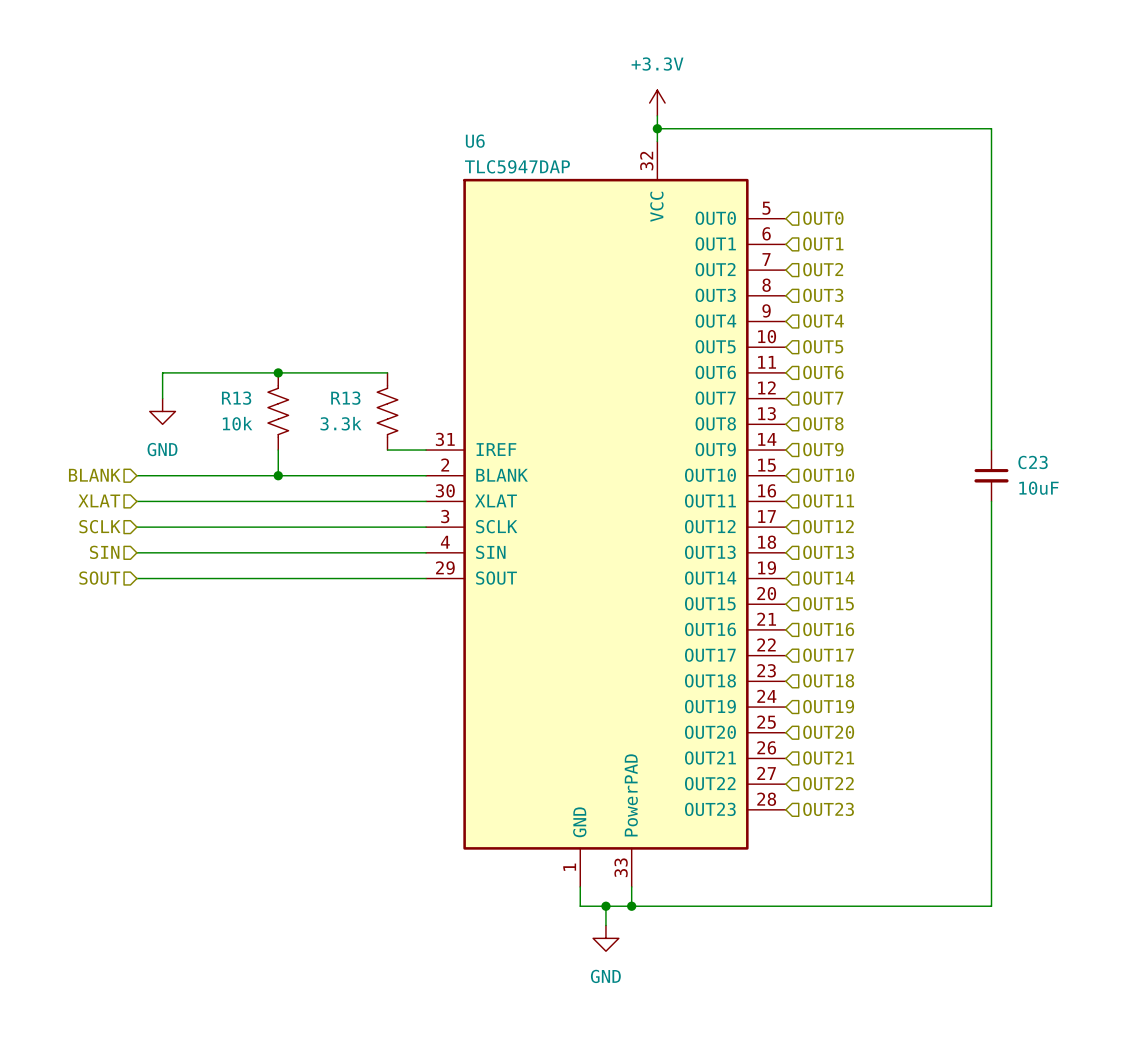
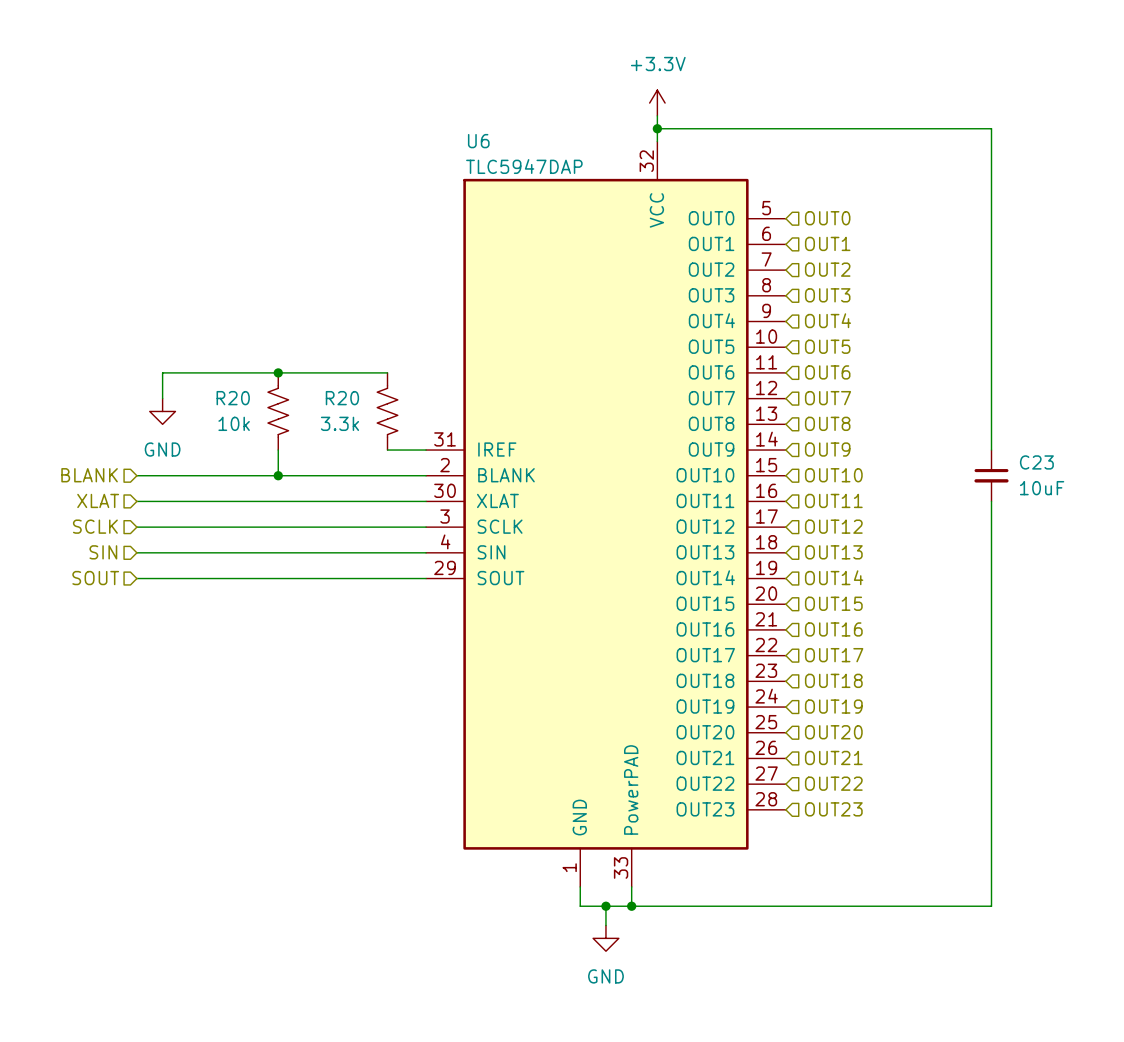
R13 name: R13 (236, 398) -> R20 (233, 398)
R13 name: R13 (345, 398) -> R20 (342, 398)

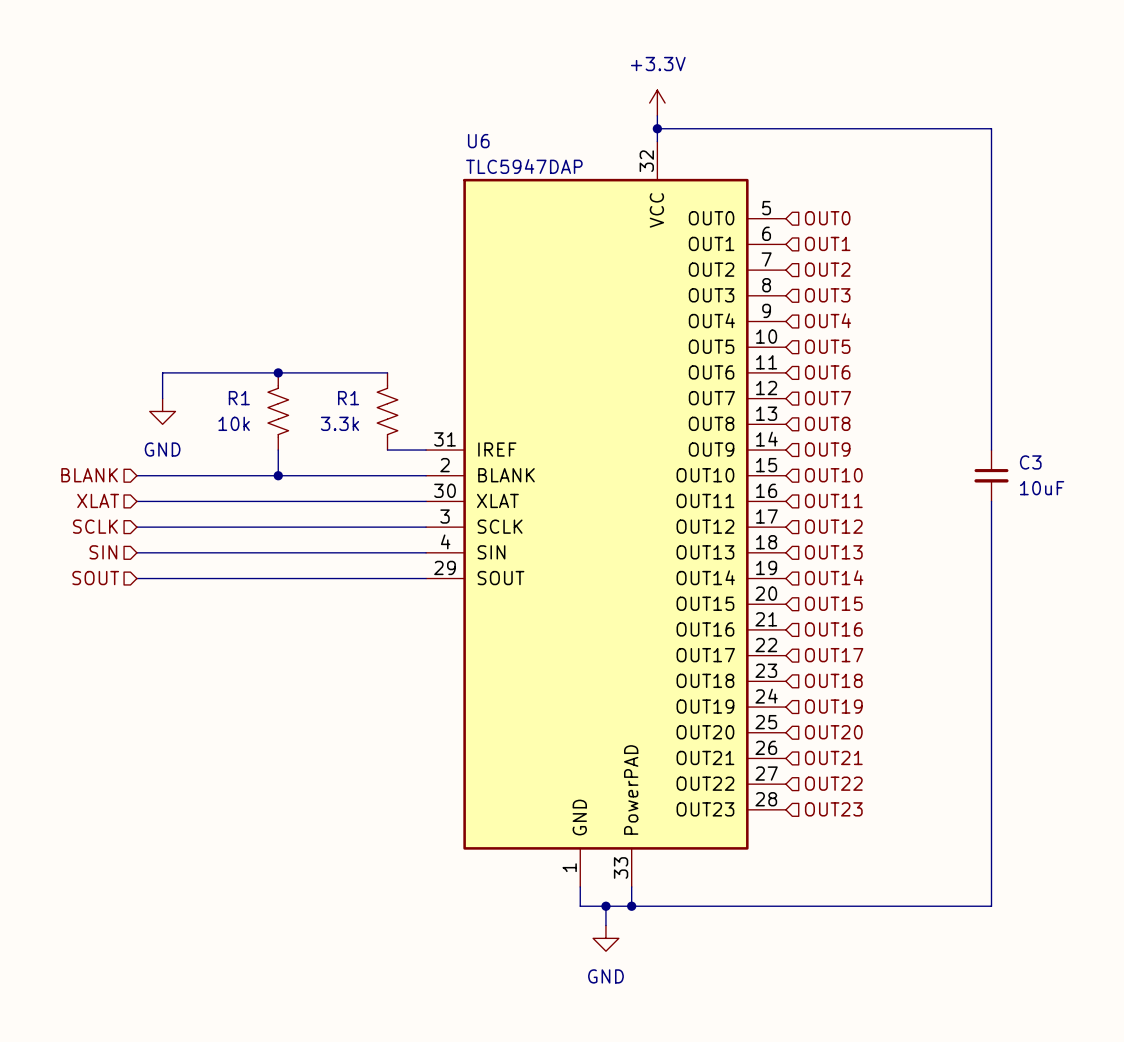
R20 name: R20 (233, 398) -> R1 (239, 398)
R20 name: R20 (342, 398) -> R1 (348, 398)
C23 name: C23 (1036, 462) -> C3 (1030, 462)

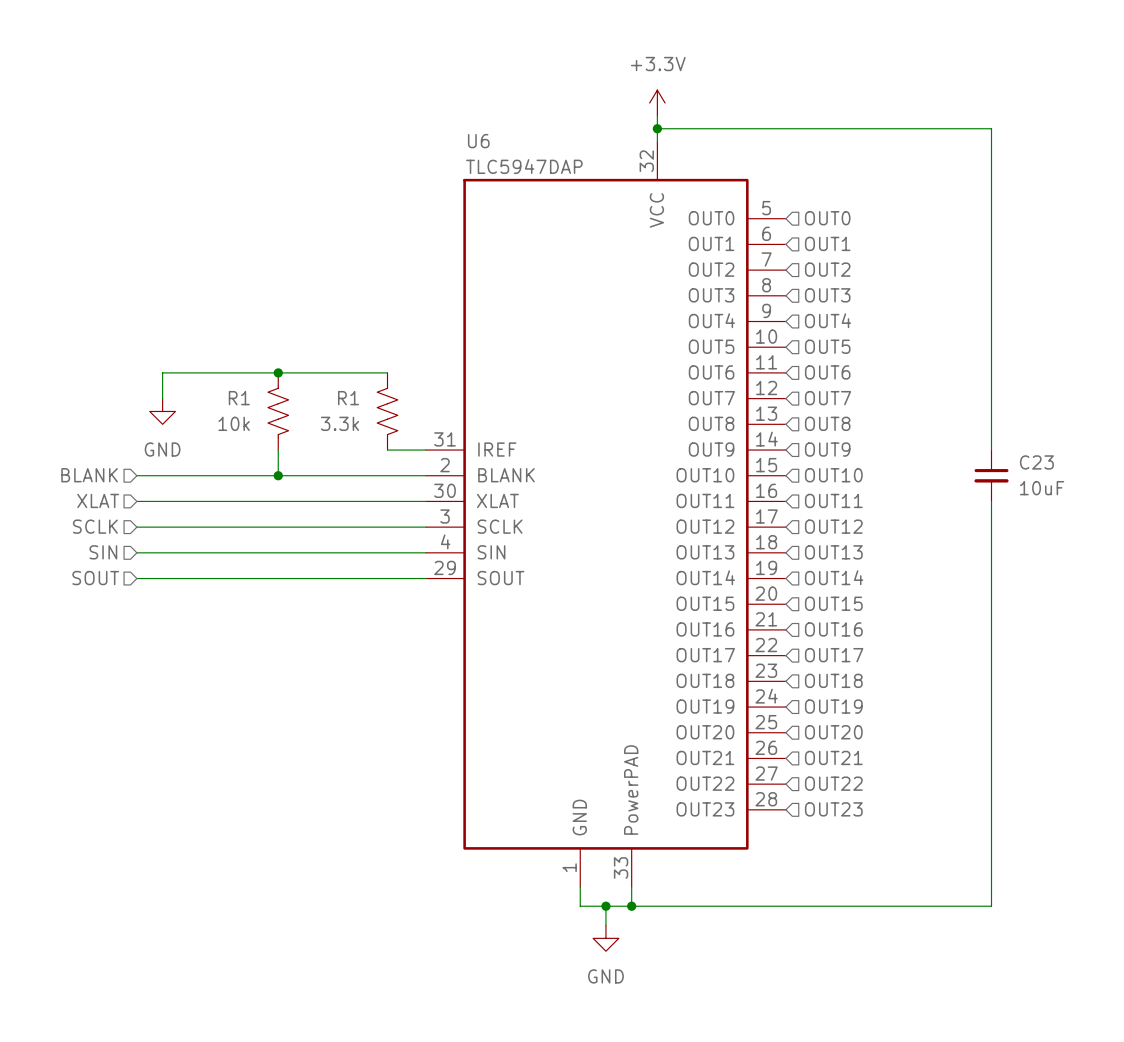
C3 name: C3 (1030, 462) -> C23 (1036, 462)

